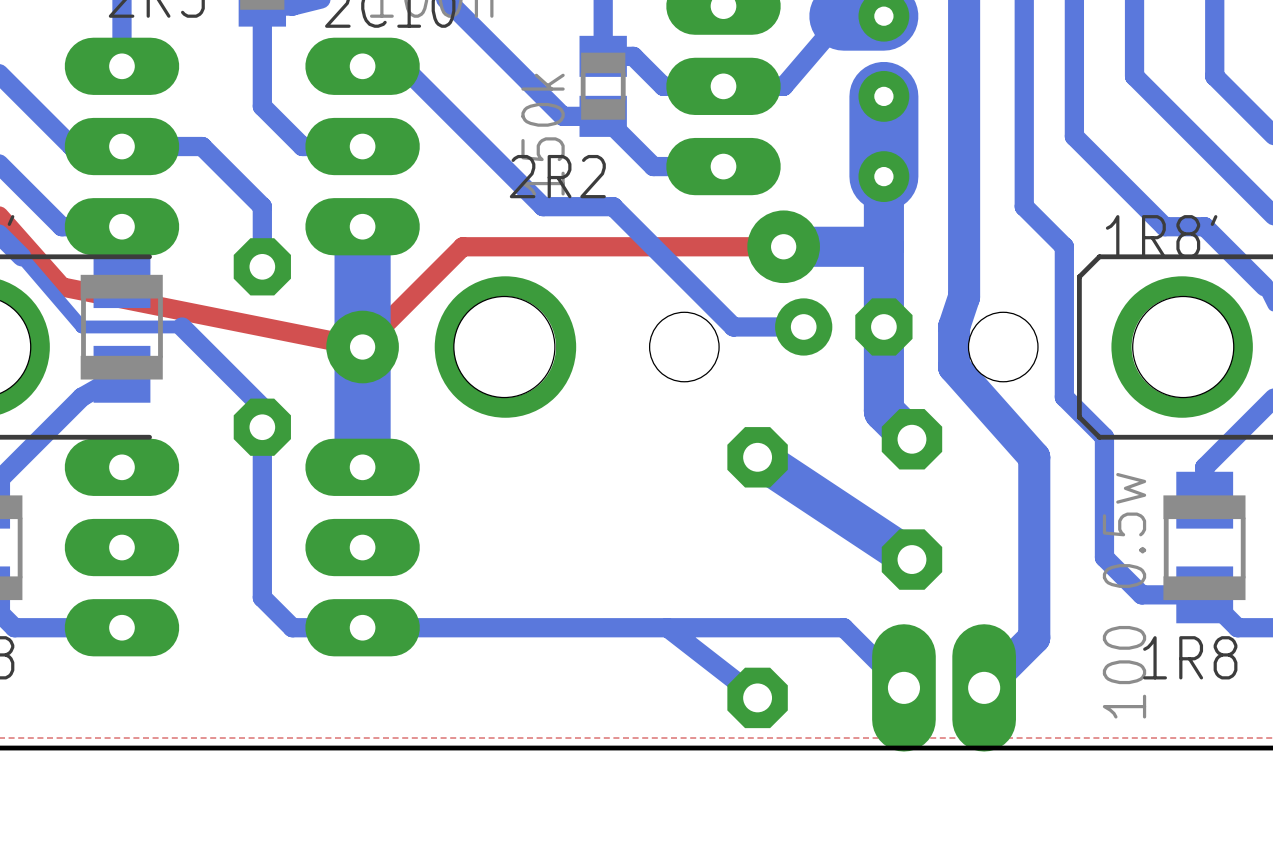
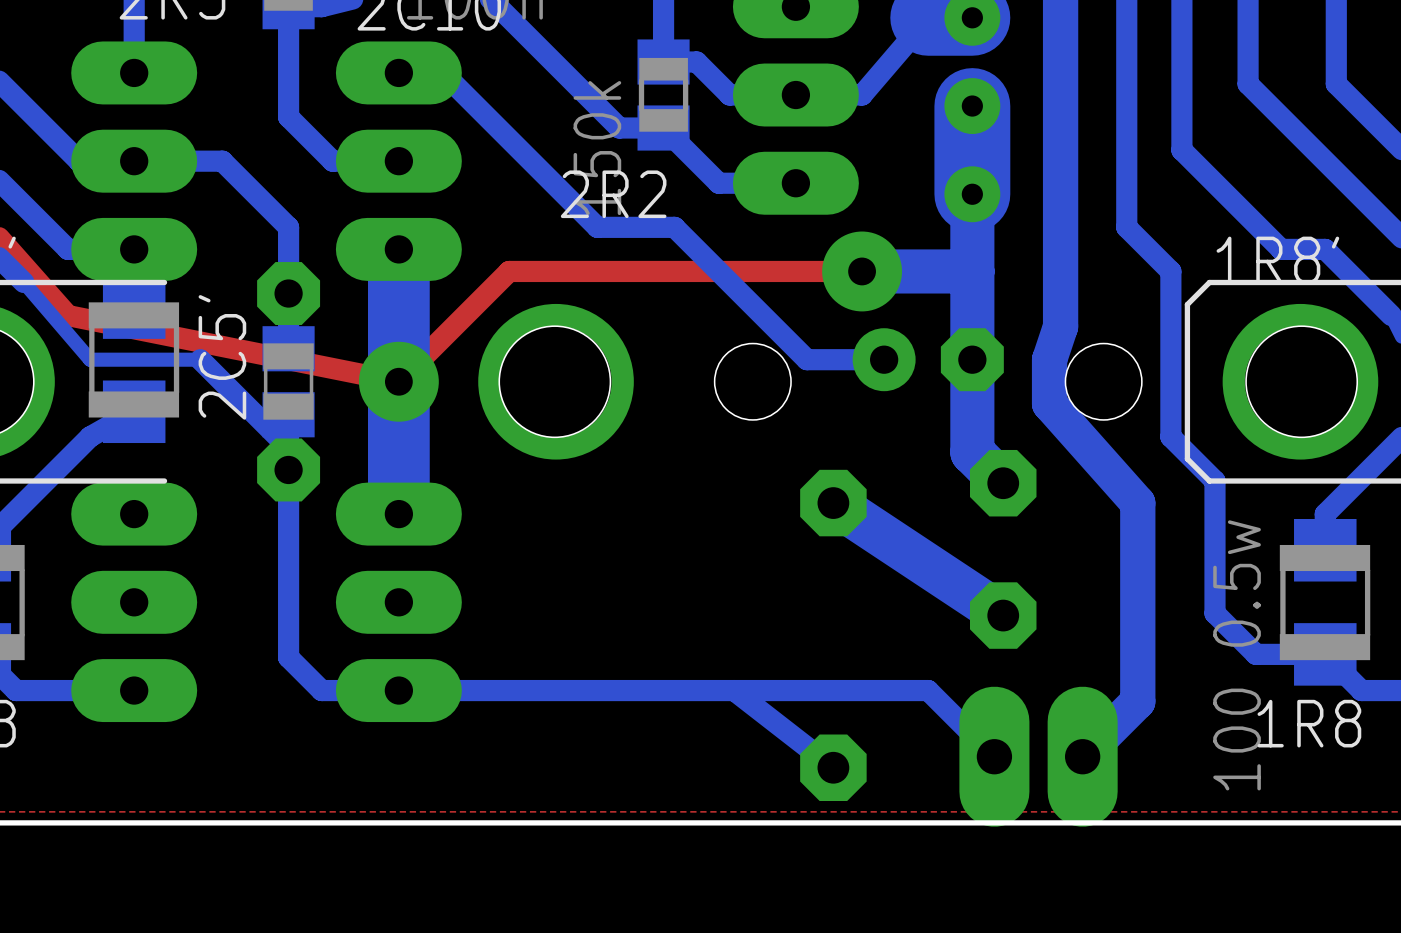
2C5': none -> (288, 381)

